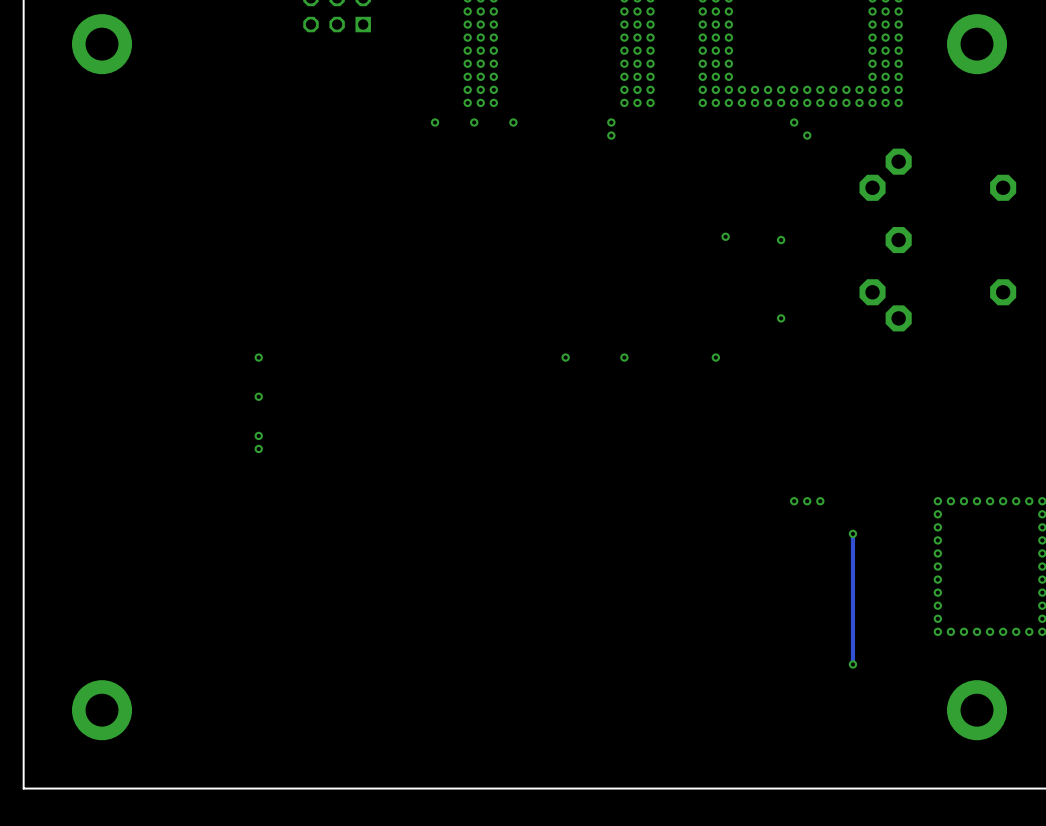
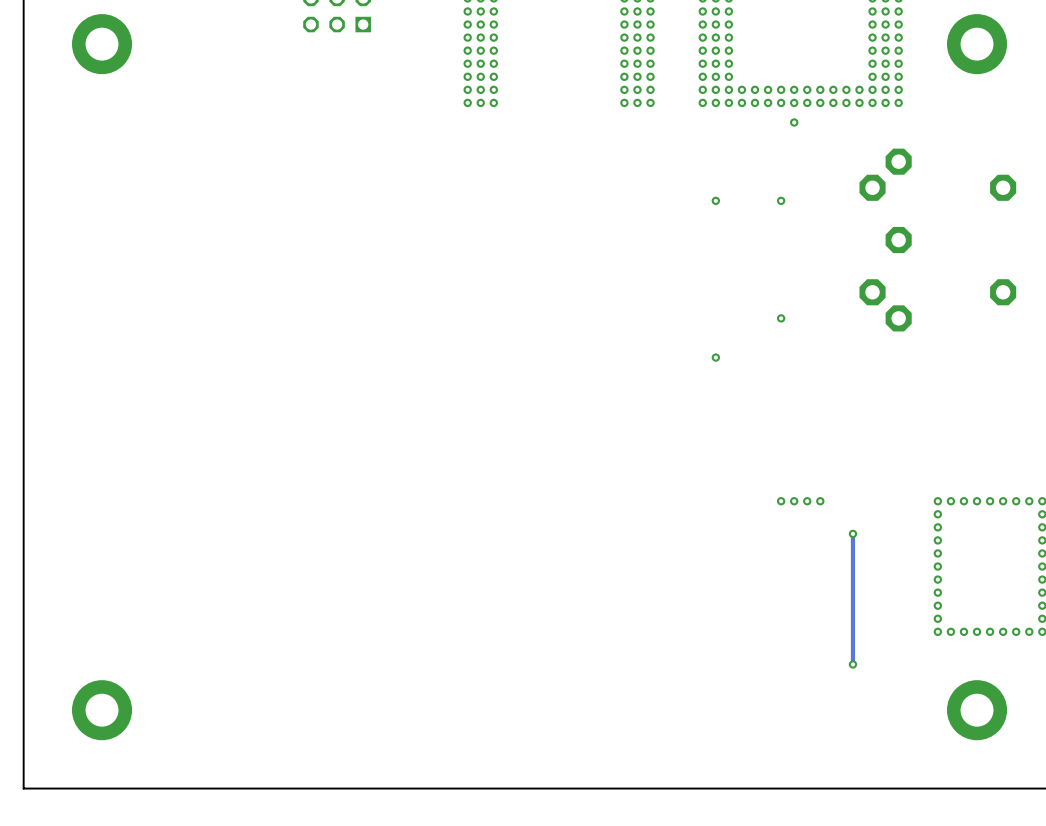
via: (435, 122) -> none
via: (474, 122) -> none
via: (513, 122) -> none
via: (611, 122) -> none
via: (611, 135) -> none
via: (807, 135) -> none
via: none -> (715, 200)
via: none -> (781, 200)
via: (725, 236) -> none
via: (781, 240) -> none
via: (258, 357) -> none
via: (565, 357) -> none
via: (624, 357) -> none
via: (258, 396) -> none
via: (258, 435) -> none
via: (258, 448) -> none
via: none -> (781, 501)

